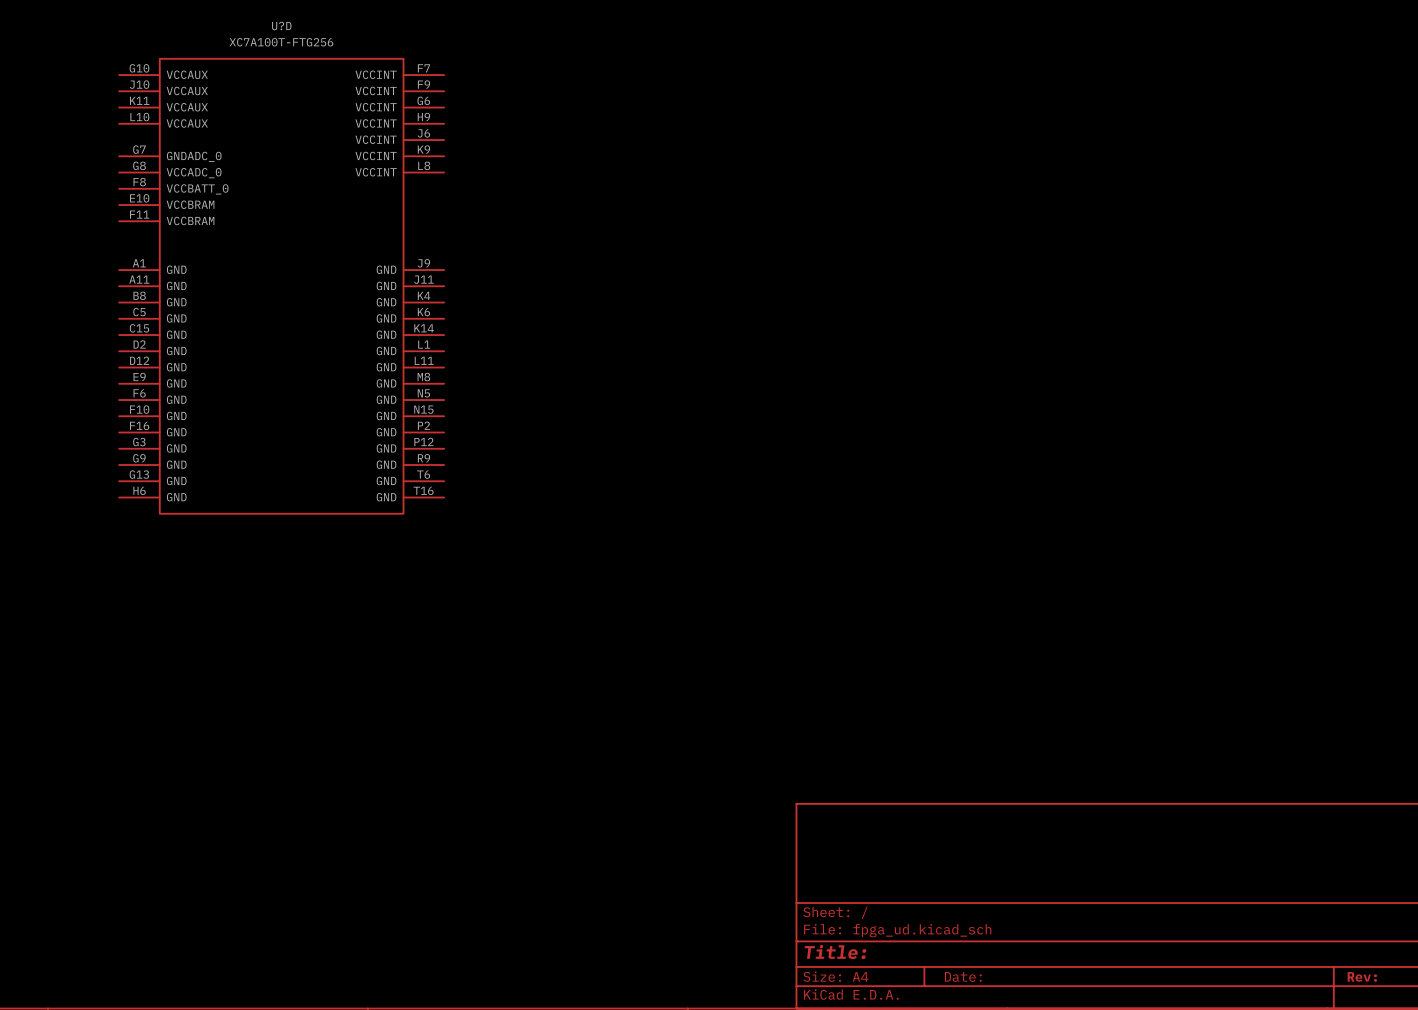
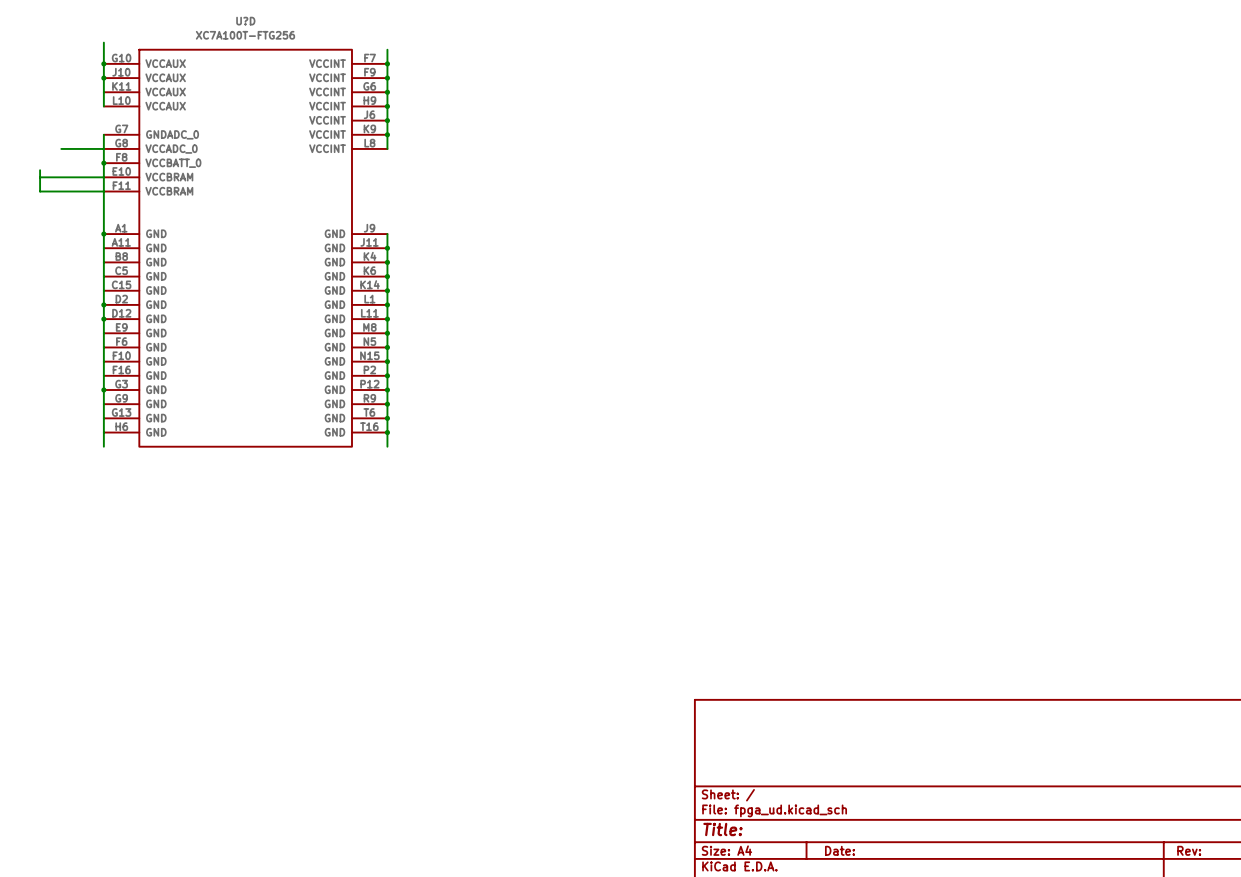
wire: none -> (103, 42) (103, 106)
wire: none -> (387, 49) (387, 148)
junction: none -> (103, 63)
junction: none -> (387, 63)
junction: none -> (103, 78)
junction: none -> (387, 78)
junction: none -> (387, 92)
junction: none -> (387, 106)
junction: none -> (387, 120)
wire: none -> (103, 134) (103, 446)
junction: none -> (387, 134)
wire: none -> (61, 148) (103, 148)
junction: none -> (103, 163)
wire: none -> (40, 170) (40, 191) (103, 191)
wire: none -> (40, 177) (103, 177)
junction: none -> (103, 234)
wire: none -> (387, 234) (387, 446)
junction: none -> (387, 248)
junction: none -> (387, 262)
junction: none -> (387, 276)
junction: none -> (387, 290)
junction: none -> (103, 304)
junction: none -> (387, 304)
junction: none -> (103, 319)
junction: none -> (387, 319)
junction: none -> (387, 333)
junction: none -> (387, 347)
junction: none -> (387, 361)
junction: none -> (387, 375)
junction: none -> (103, 390)
junction: none -> (387, 390)
junction: none -> (387, 404)
junction: none -> (387, 418)
junction: none -> (387, 432)

